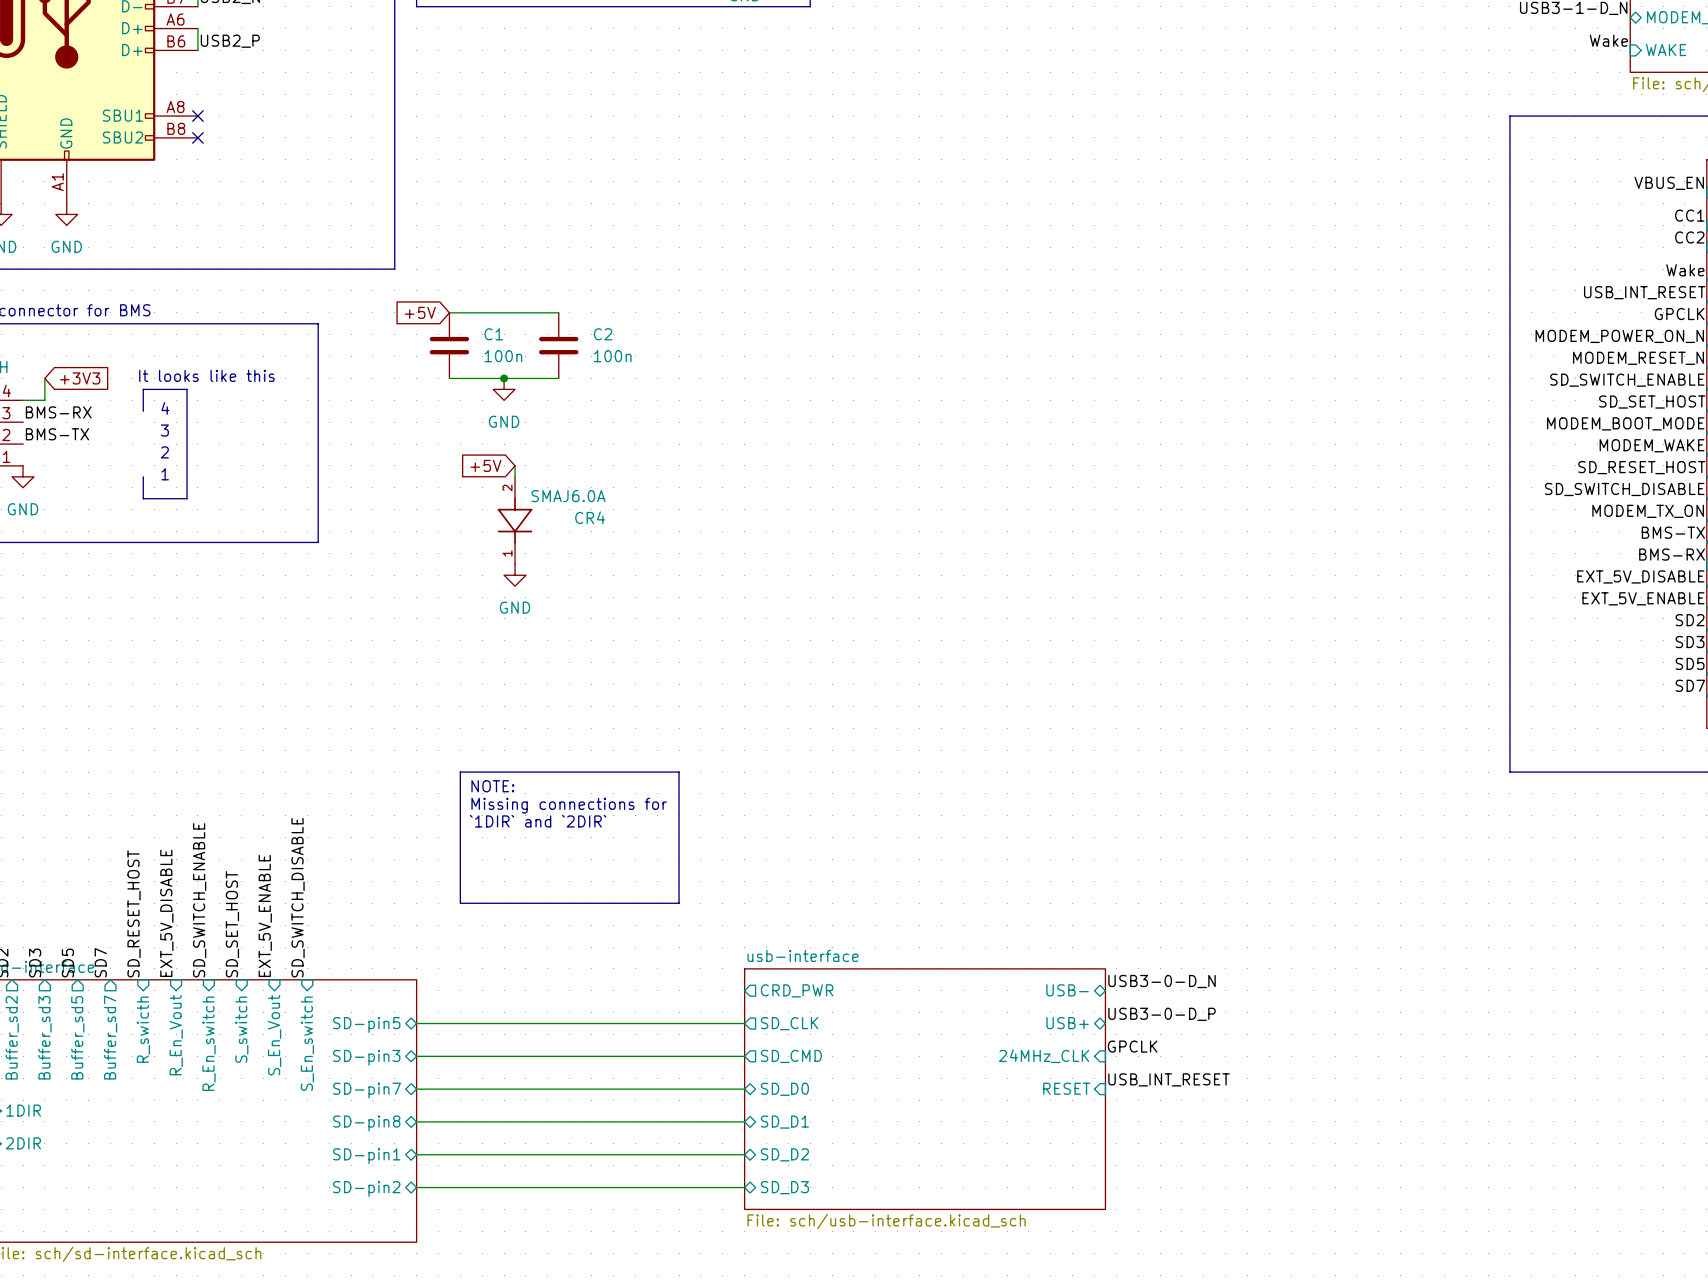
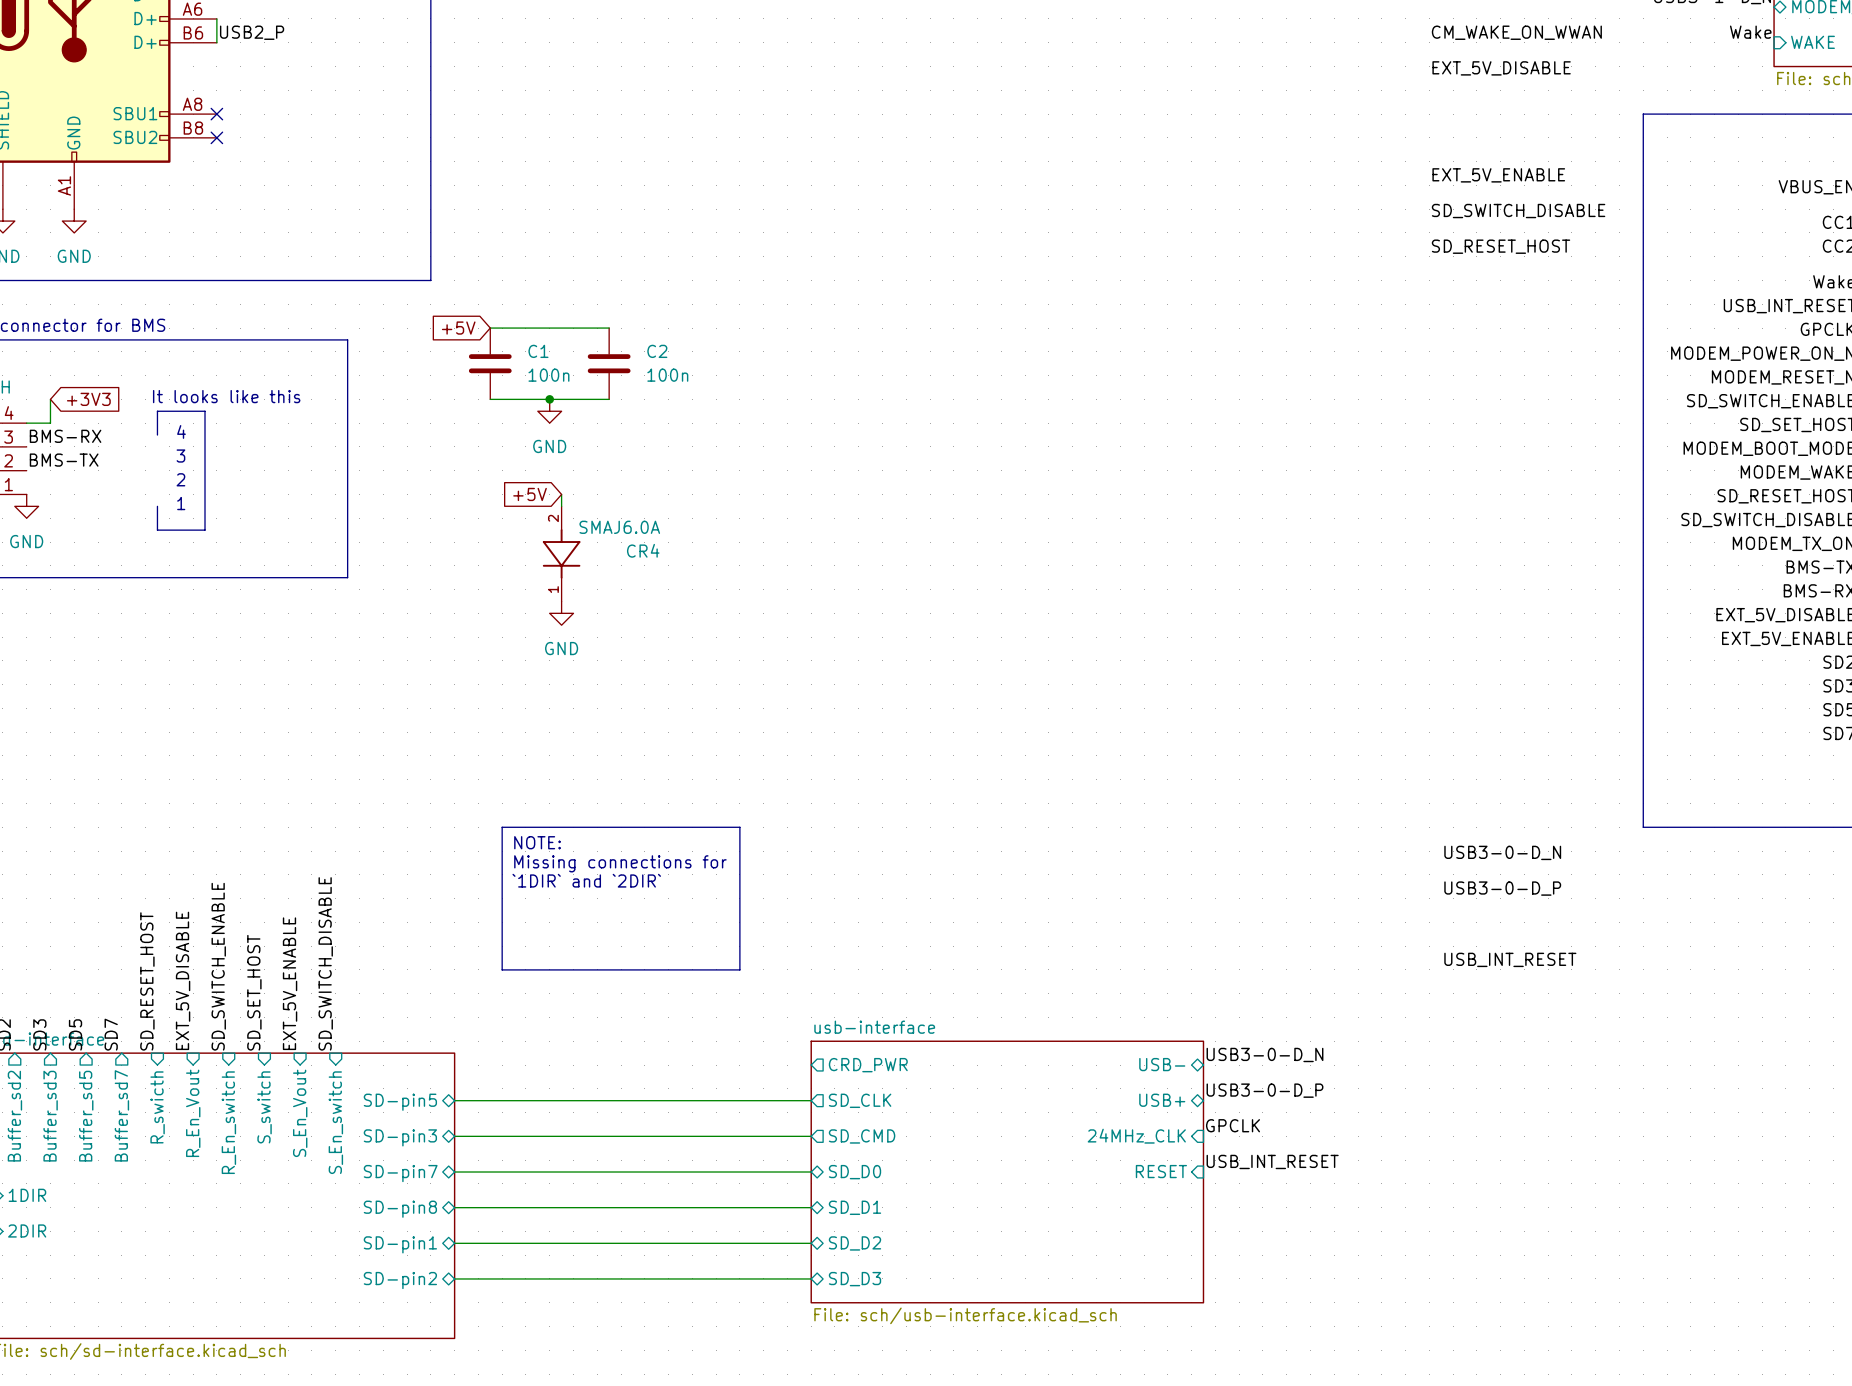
label: none -> CM_WAKE_ON_WWAN (1516, 32)
label: none -> EXT_5V_DISABLE (1501, 68)
label: none -> EXT_5V_ENABLE (1498, 175)
label: none -> SD_SWITCH_DISABLE (1518, 211)
label: none -> SD_RESET_HOST (1501, 246)
label: none -> USB3-0-D_N (1502, 852)
label: none -> USB3-0-D_P (1502, 888)
label: none -> USB_INT_RESET (1510, 959)

